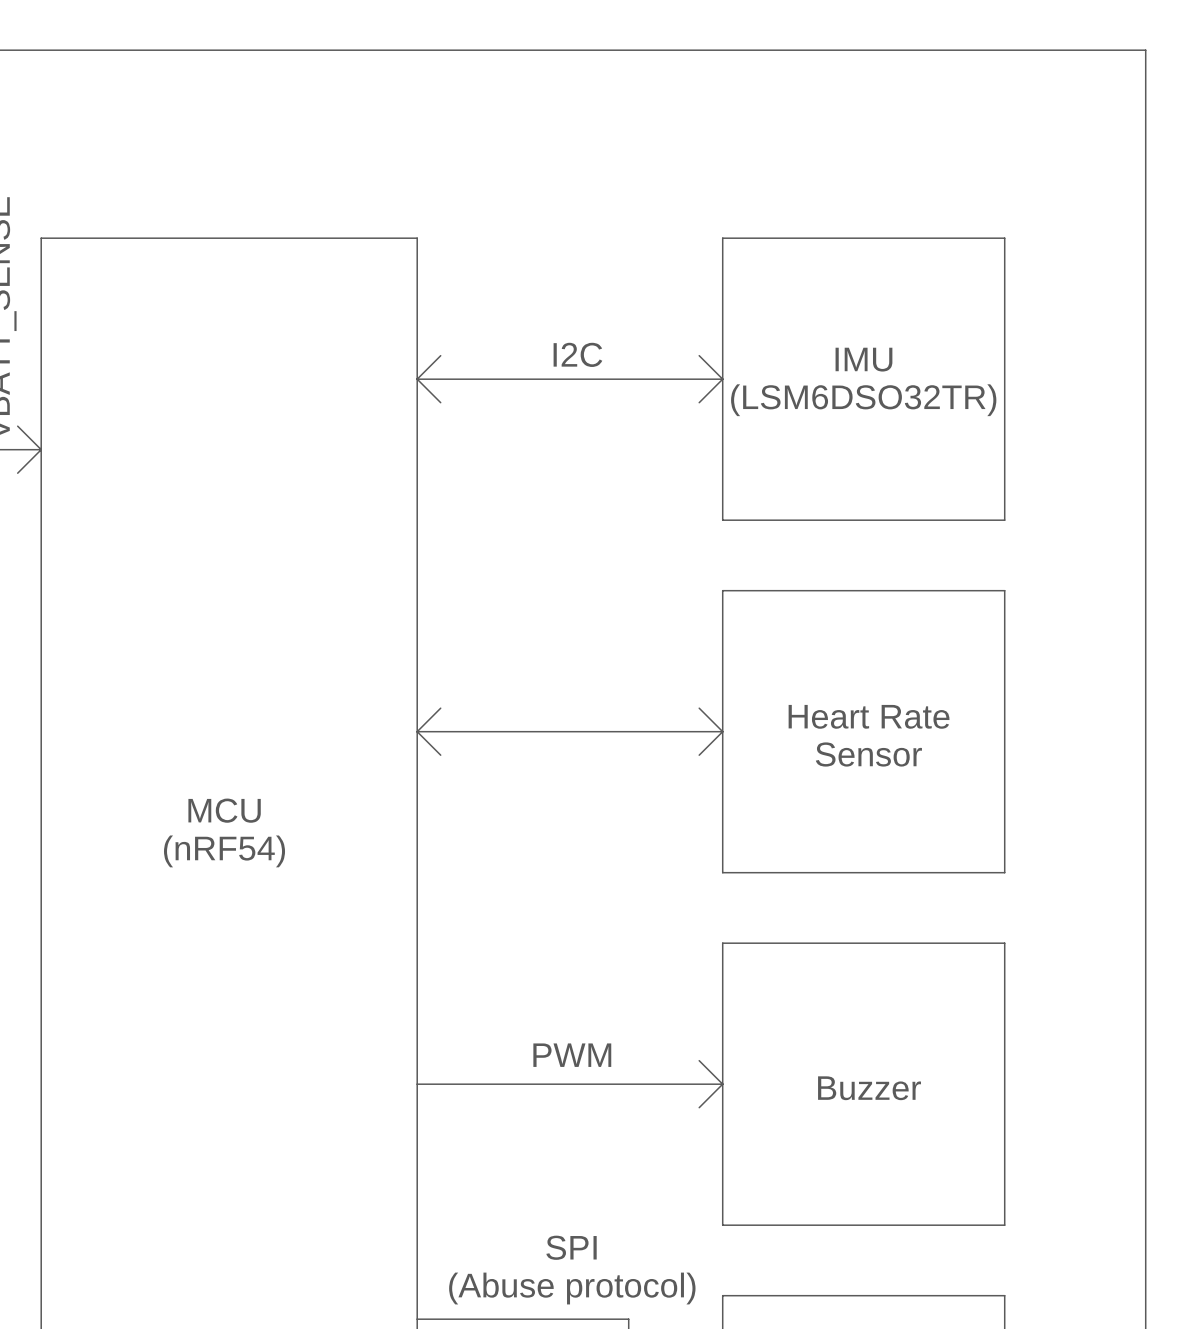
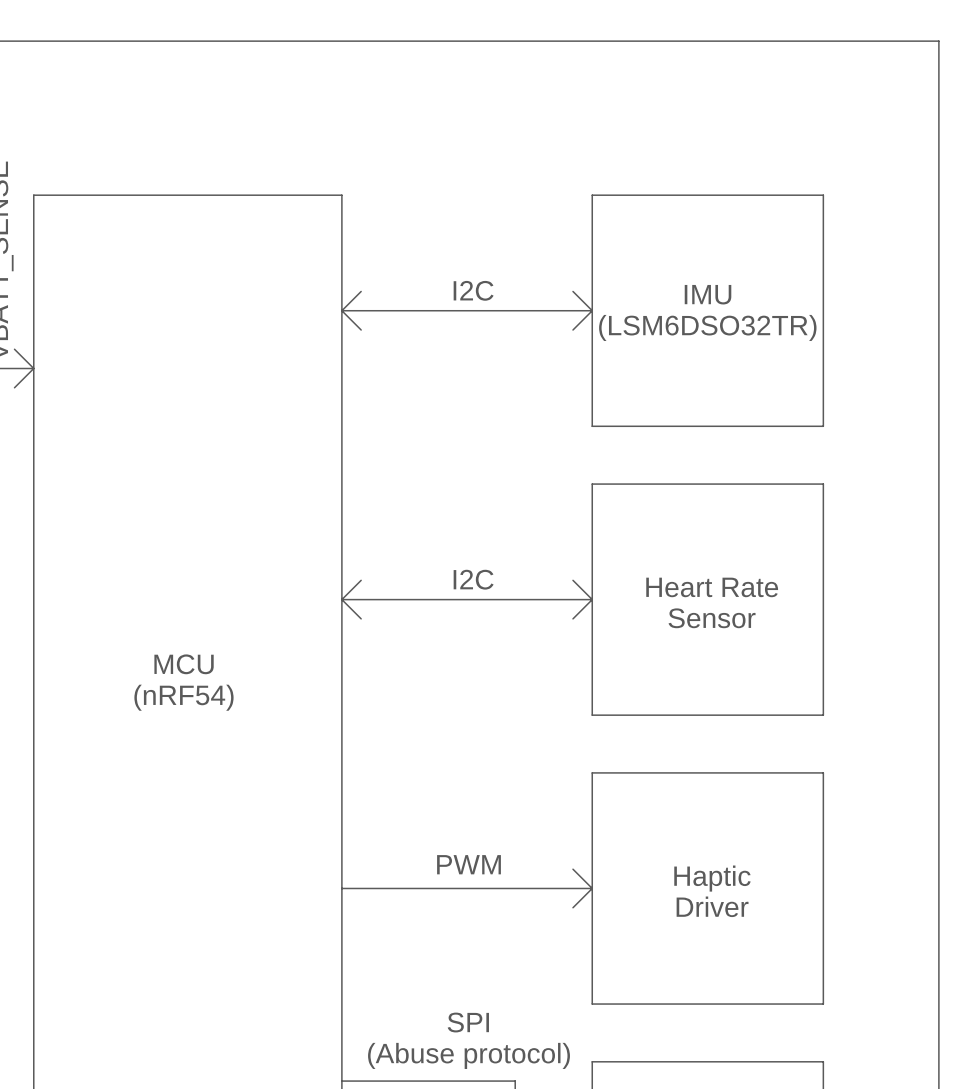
text: none -> I2C (473, 579)
text: none -> Haptic (712, 878)
text: Buzzer (869, 1088) -> none
text: none -> Driver (712, 906)

